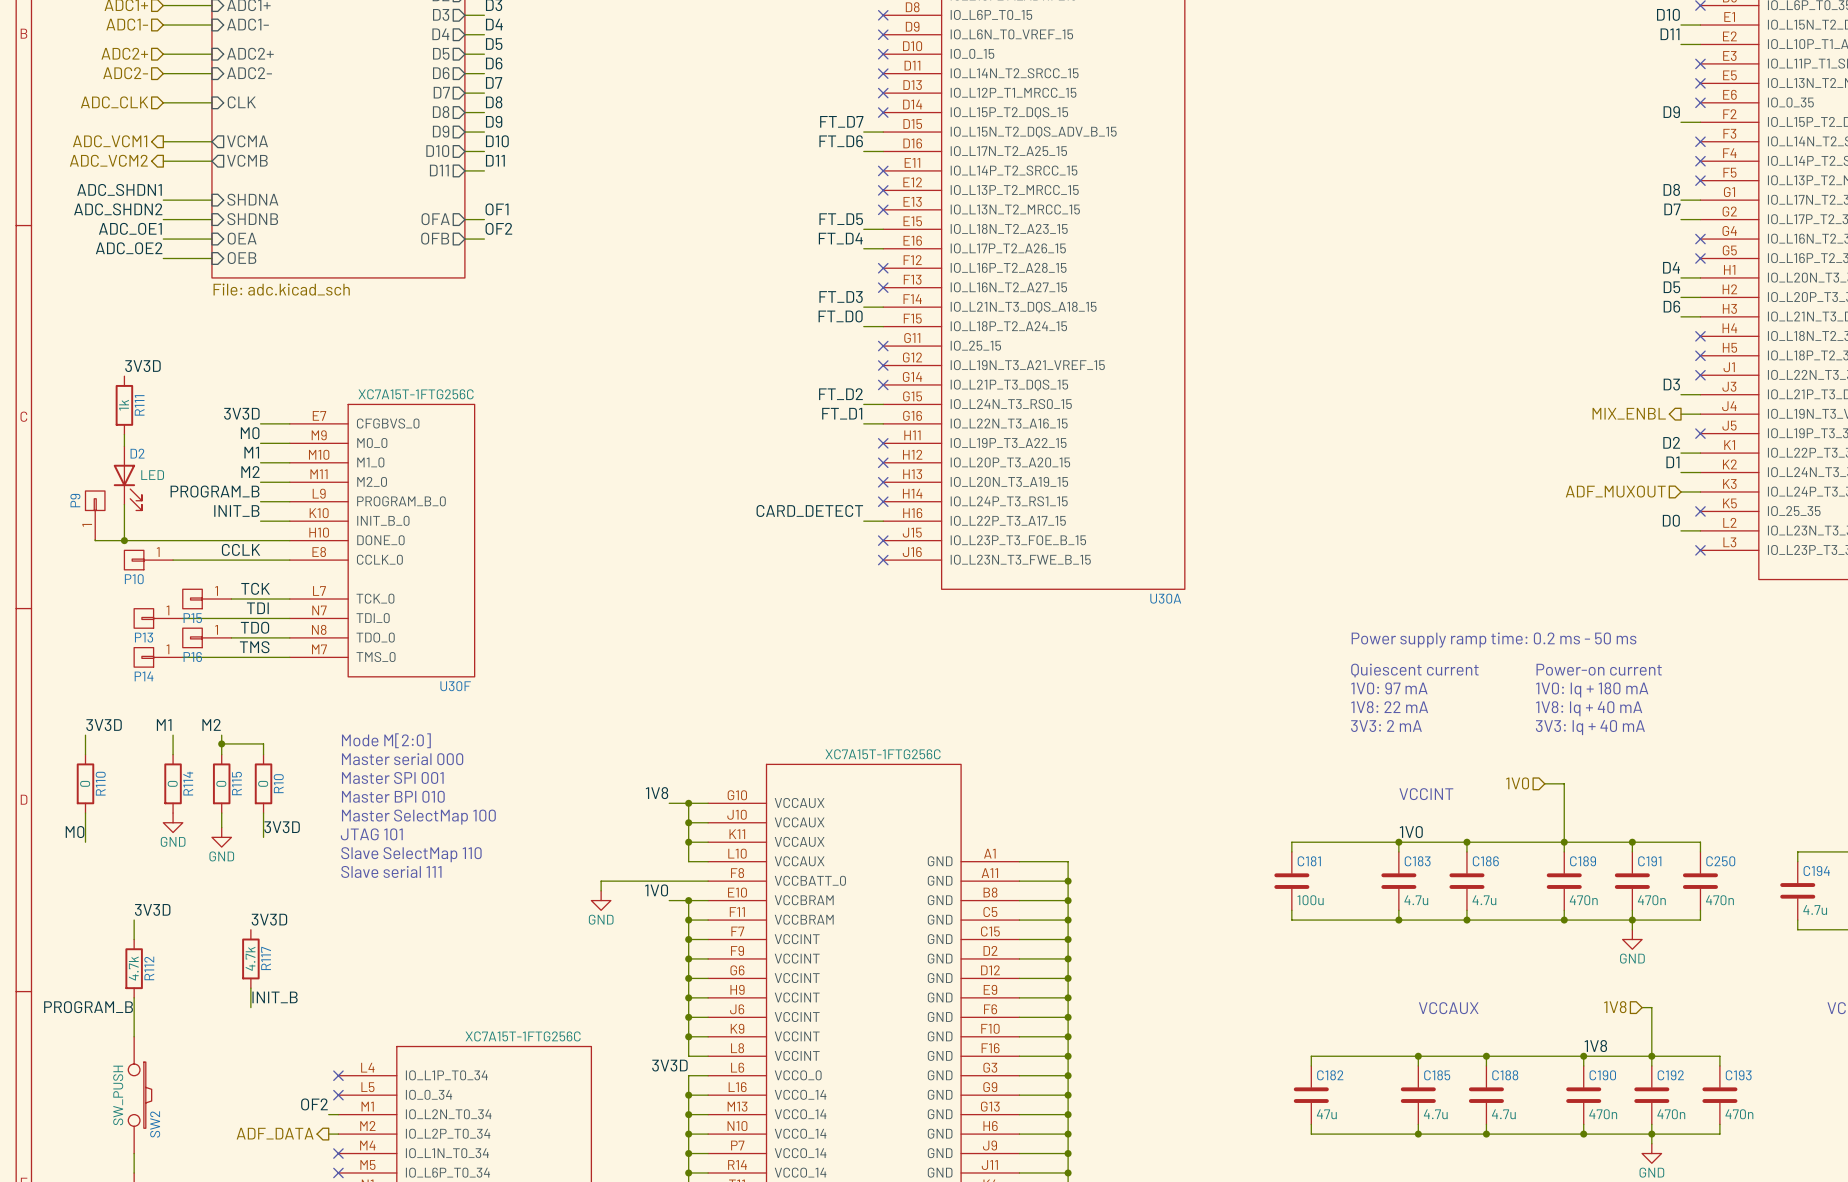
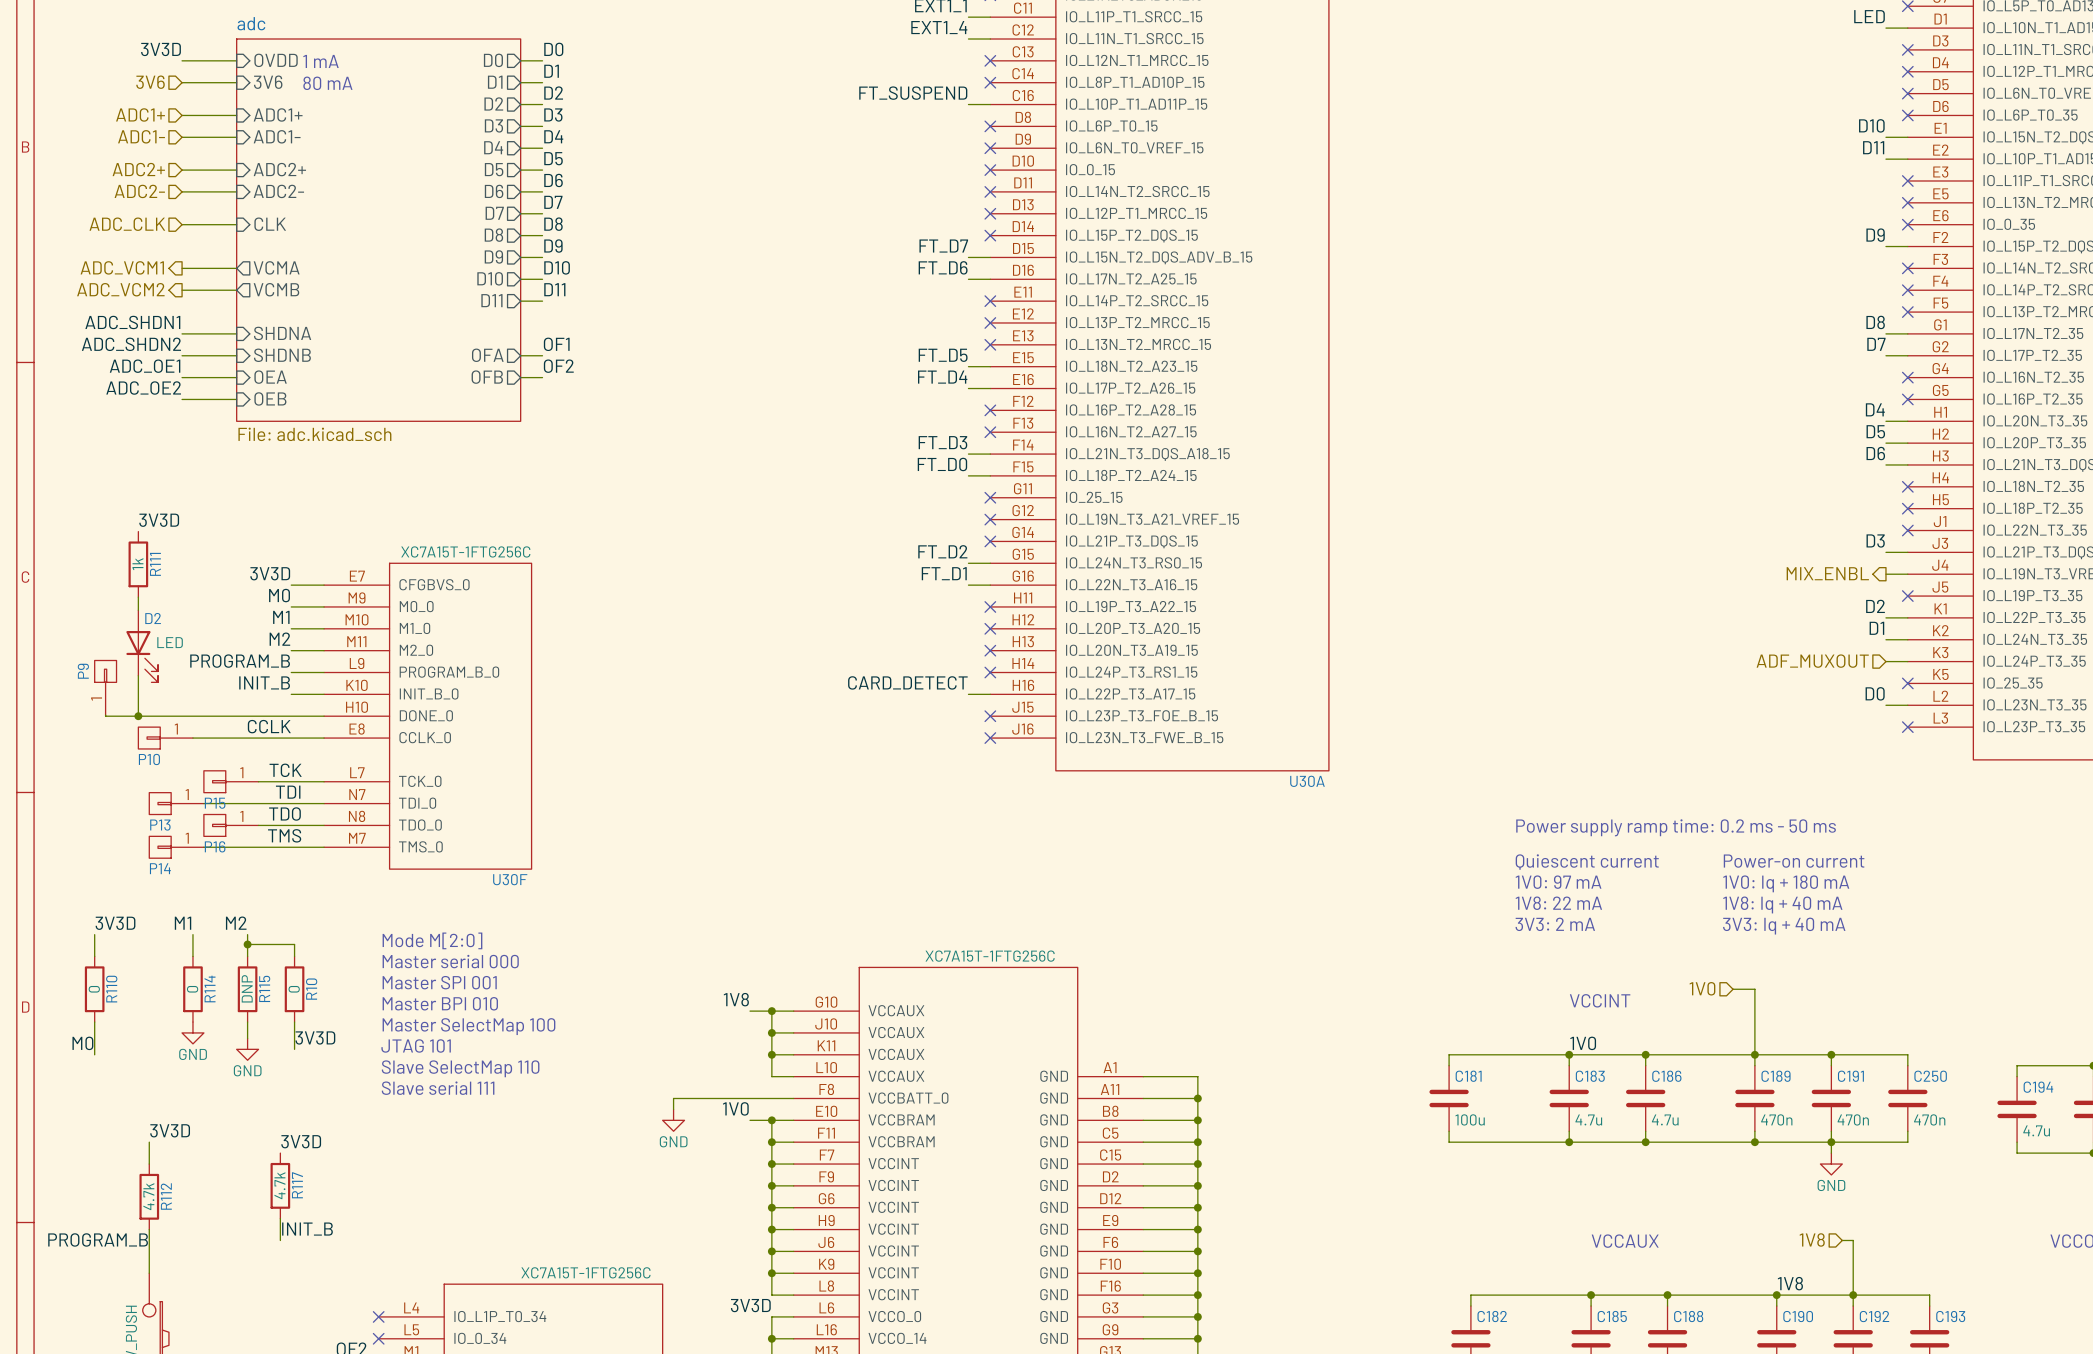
R115 value: 0 (221, 783) -> DNP (247, 988)

